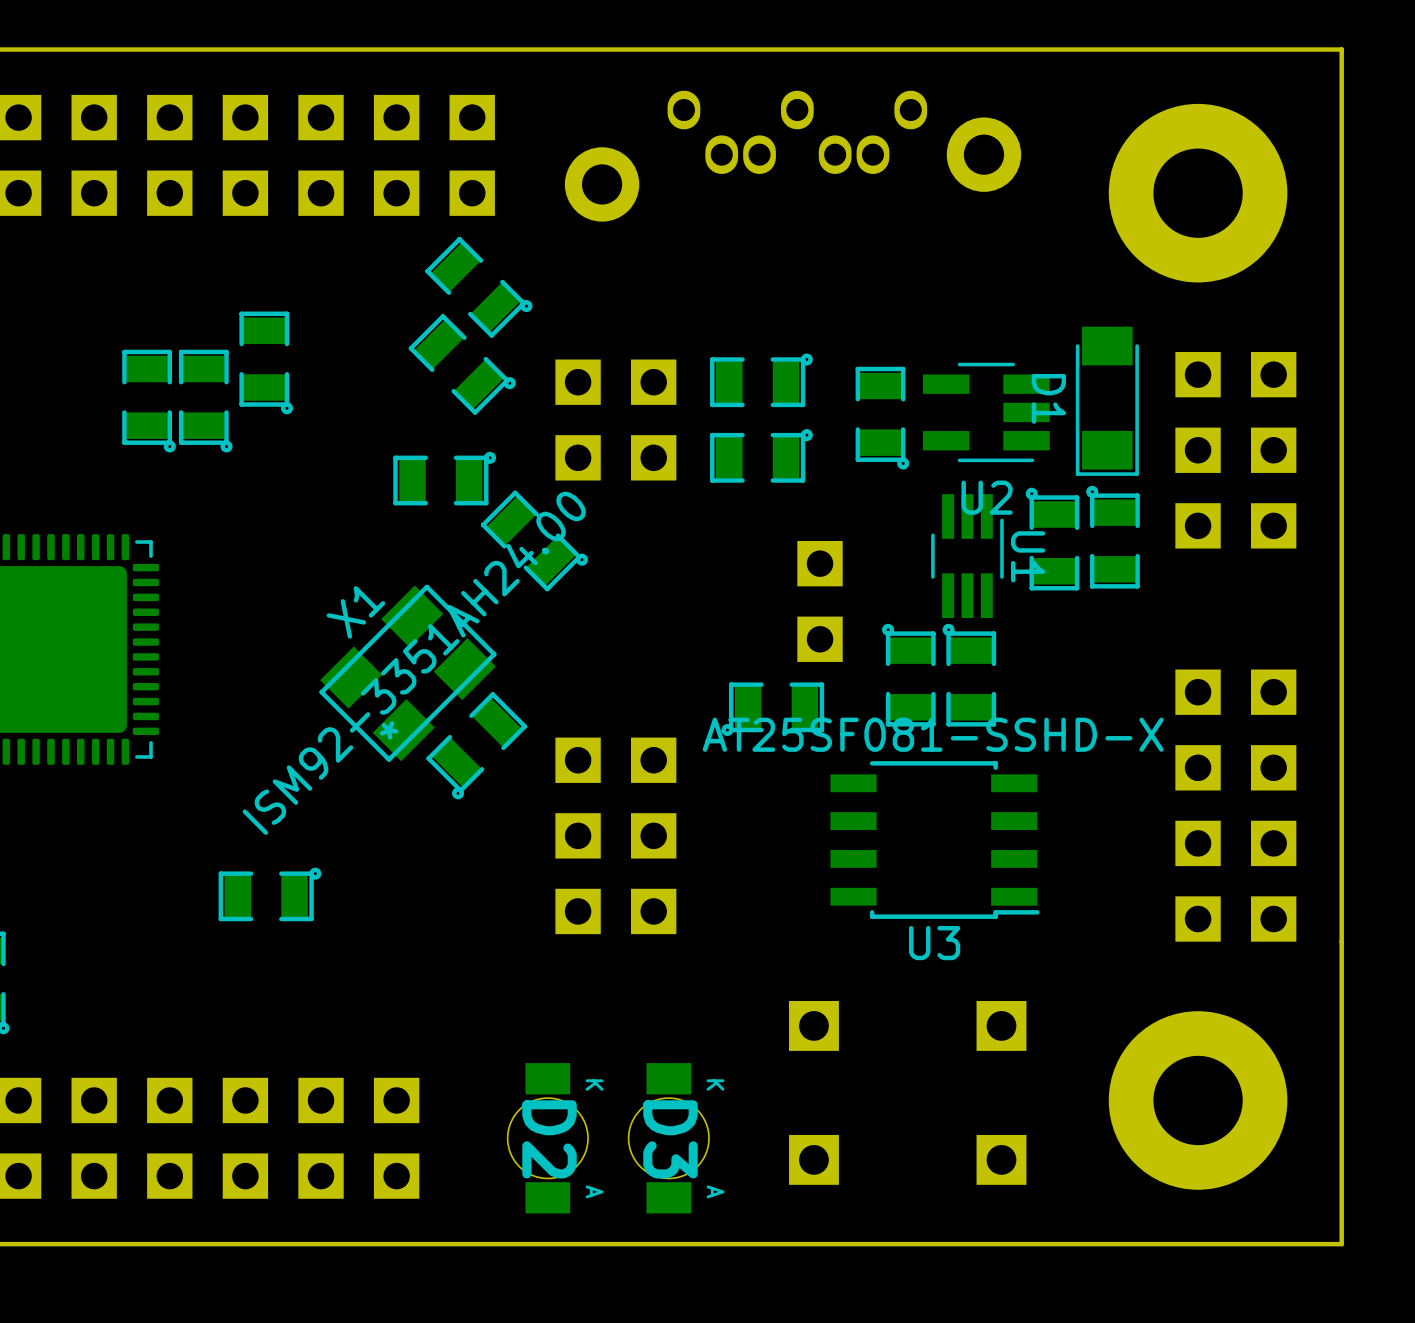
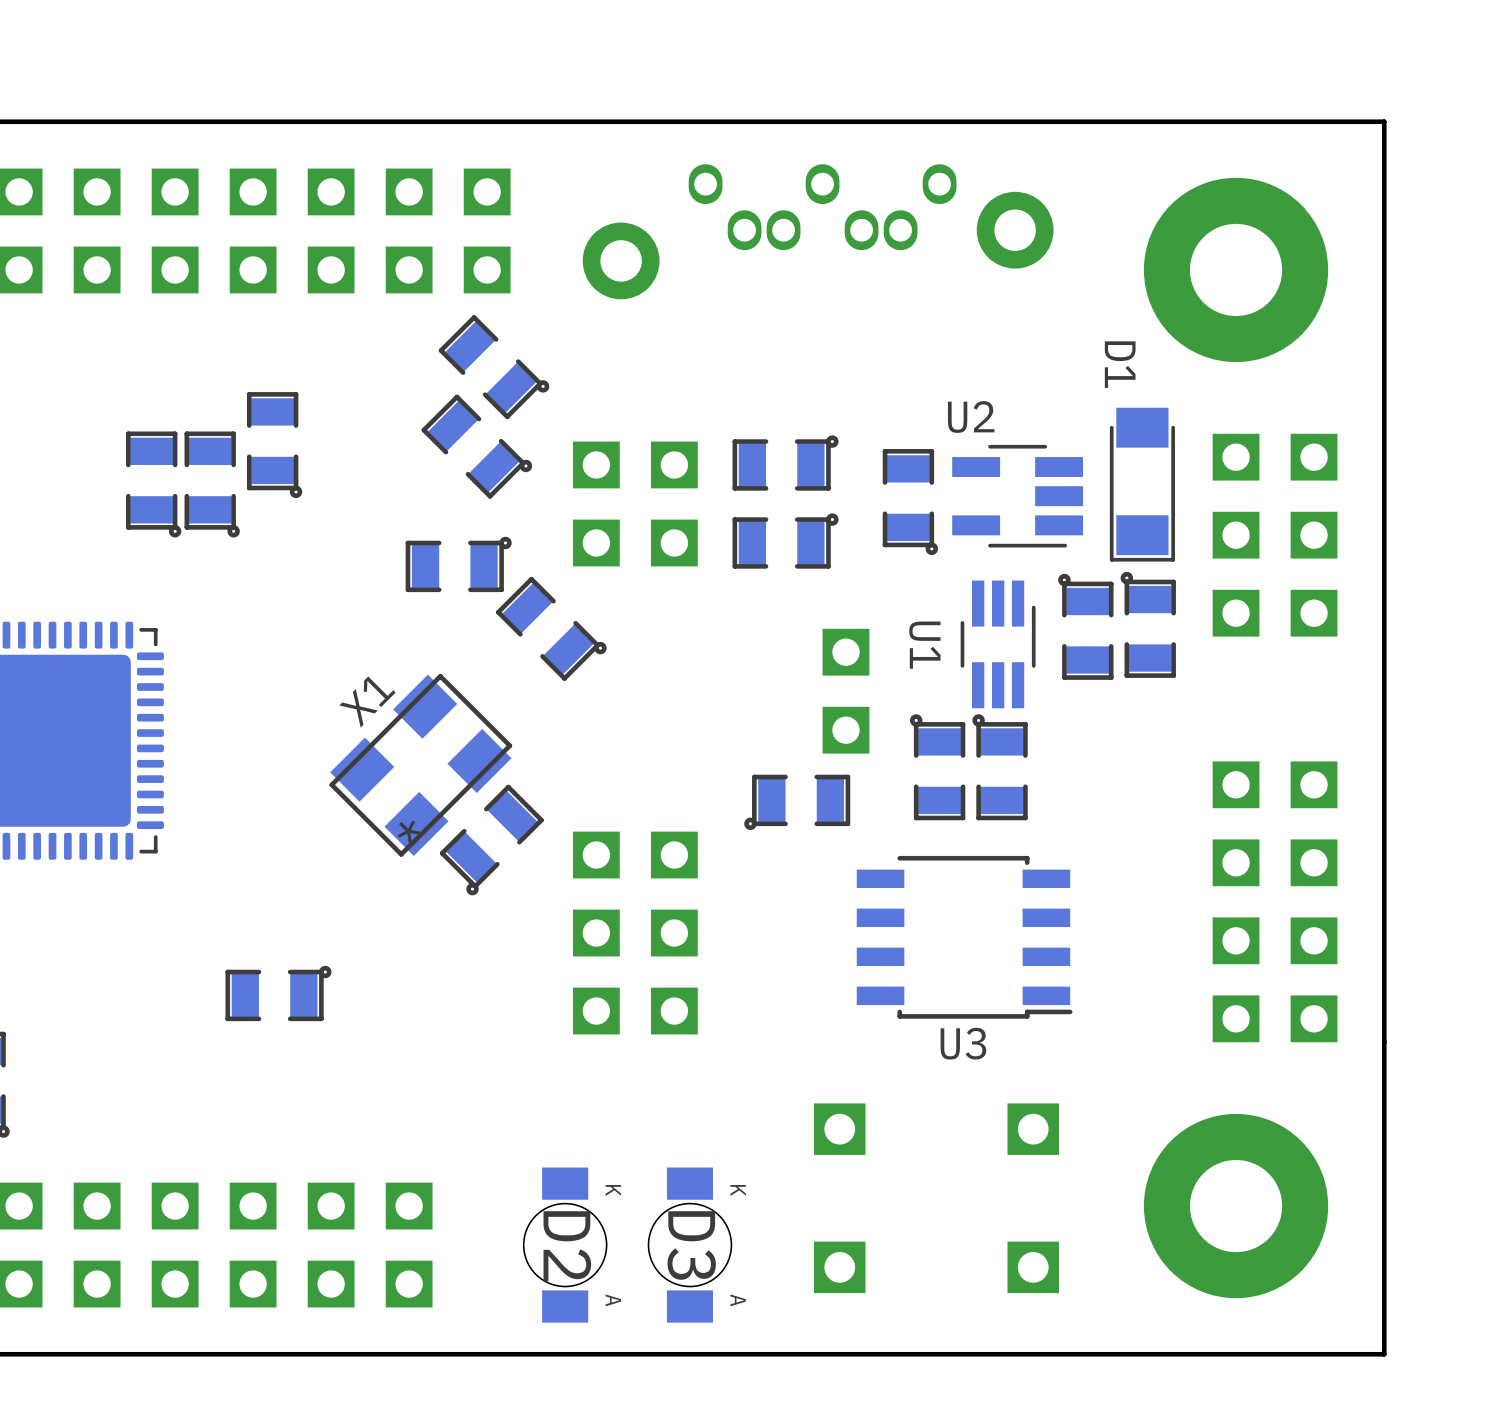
D1 name position: D1 (1048, 398) -> D1 (1120, 364)
U2 name position: U2 (987, 497) -> U2 (971, 417)
U1 name position: U1 (1028, 556) -> U1 (924, 645)
X1 value: ISM92-3351AH24.00 (414, 663) -> none
U3 value: AT25SF081-SSHD-X (933, 734) -> none

